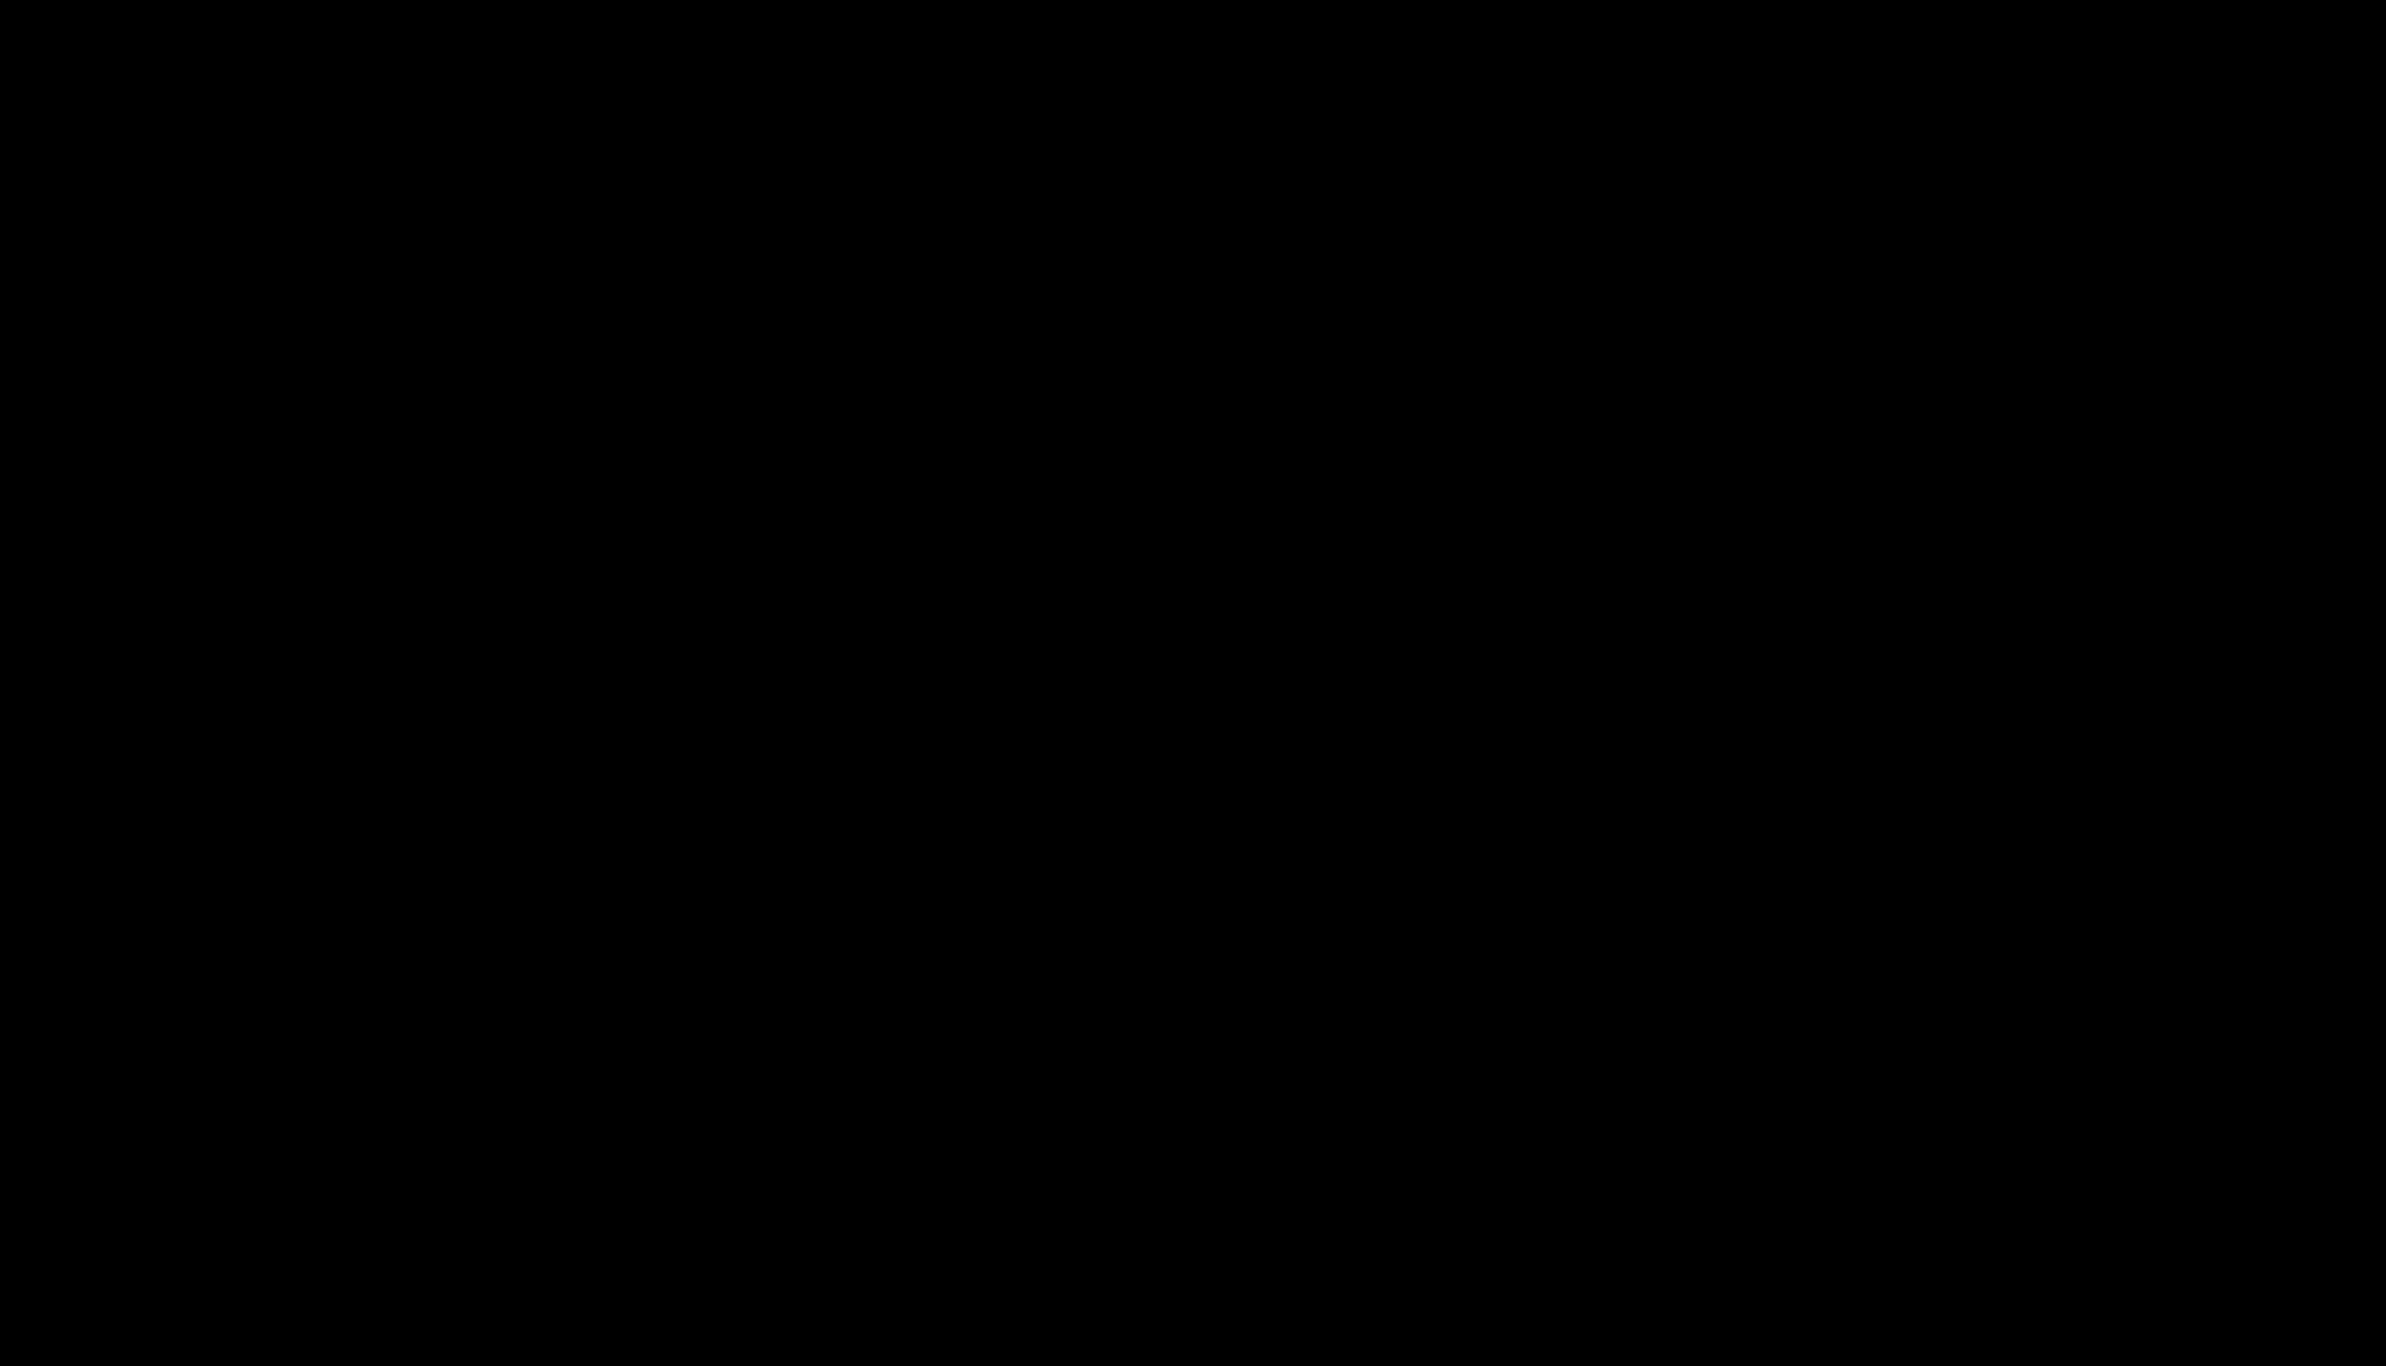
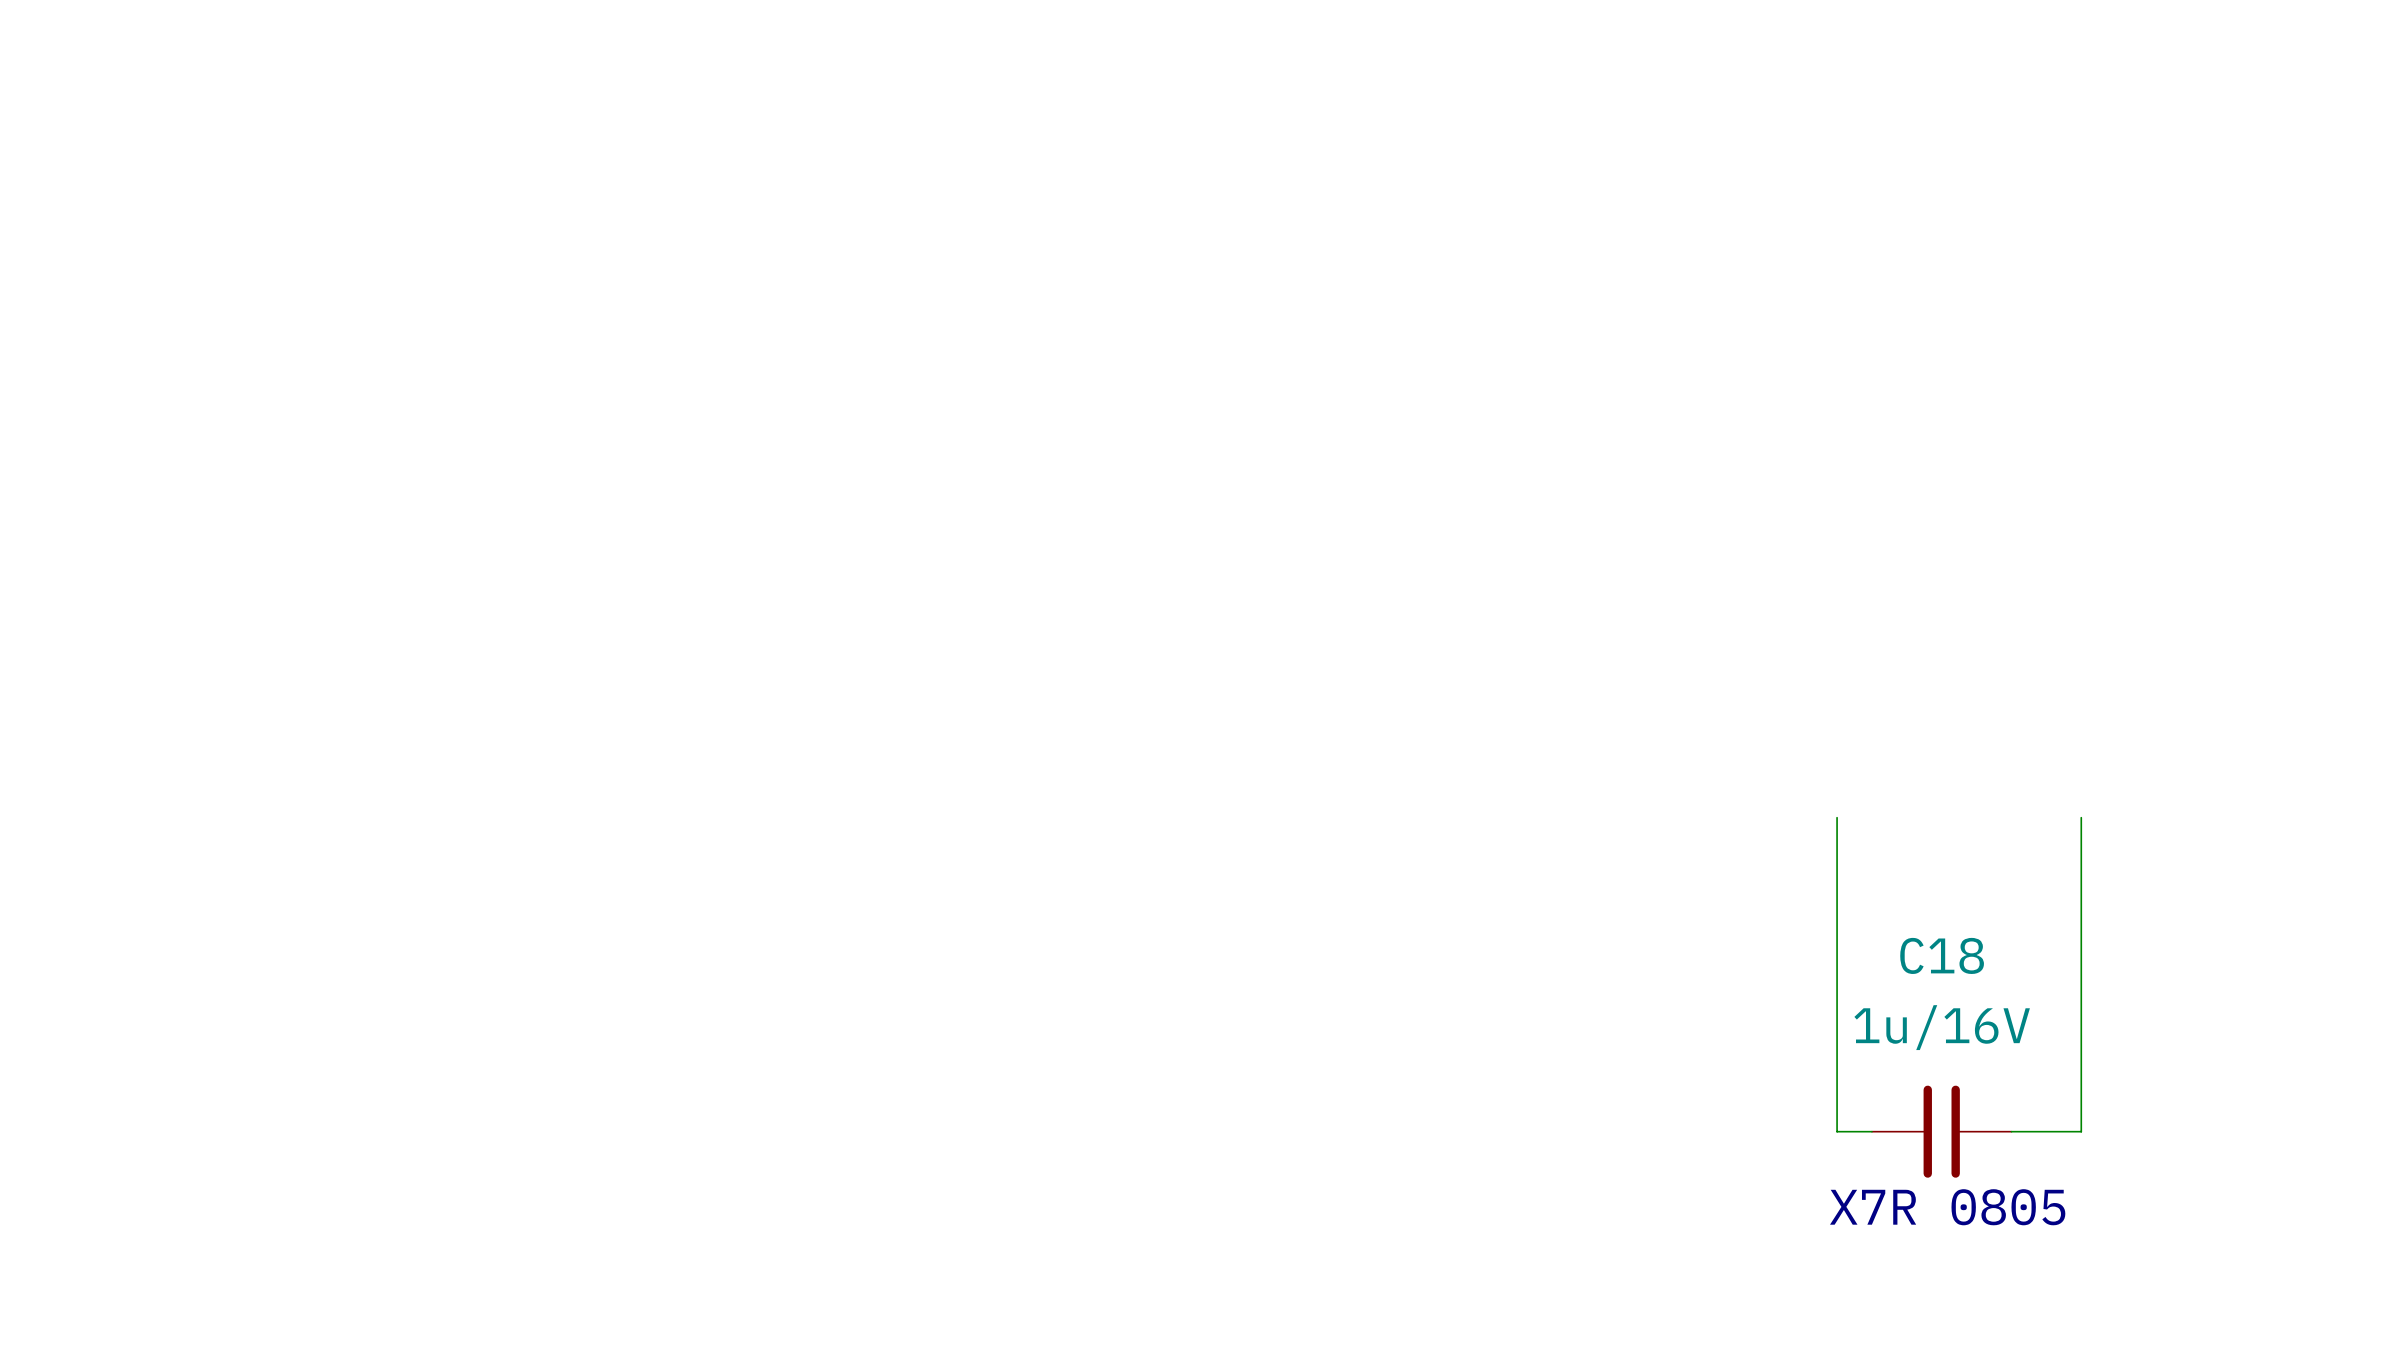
wire: none -> (1837, 817) (1837, 1131) (1871, 1131)
wire: none -> (2081, 817) (2081, 1131) (2011, 1131)
C18: none -> 1u/16V (1941, 1131)
text: none -> X7R 0805 (1947, 1207)

